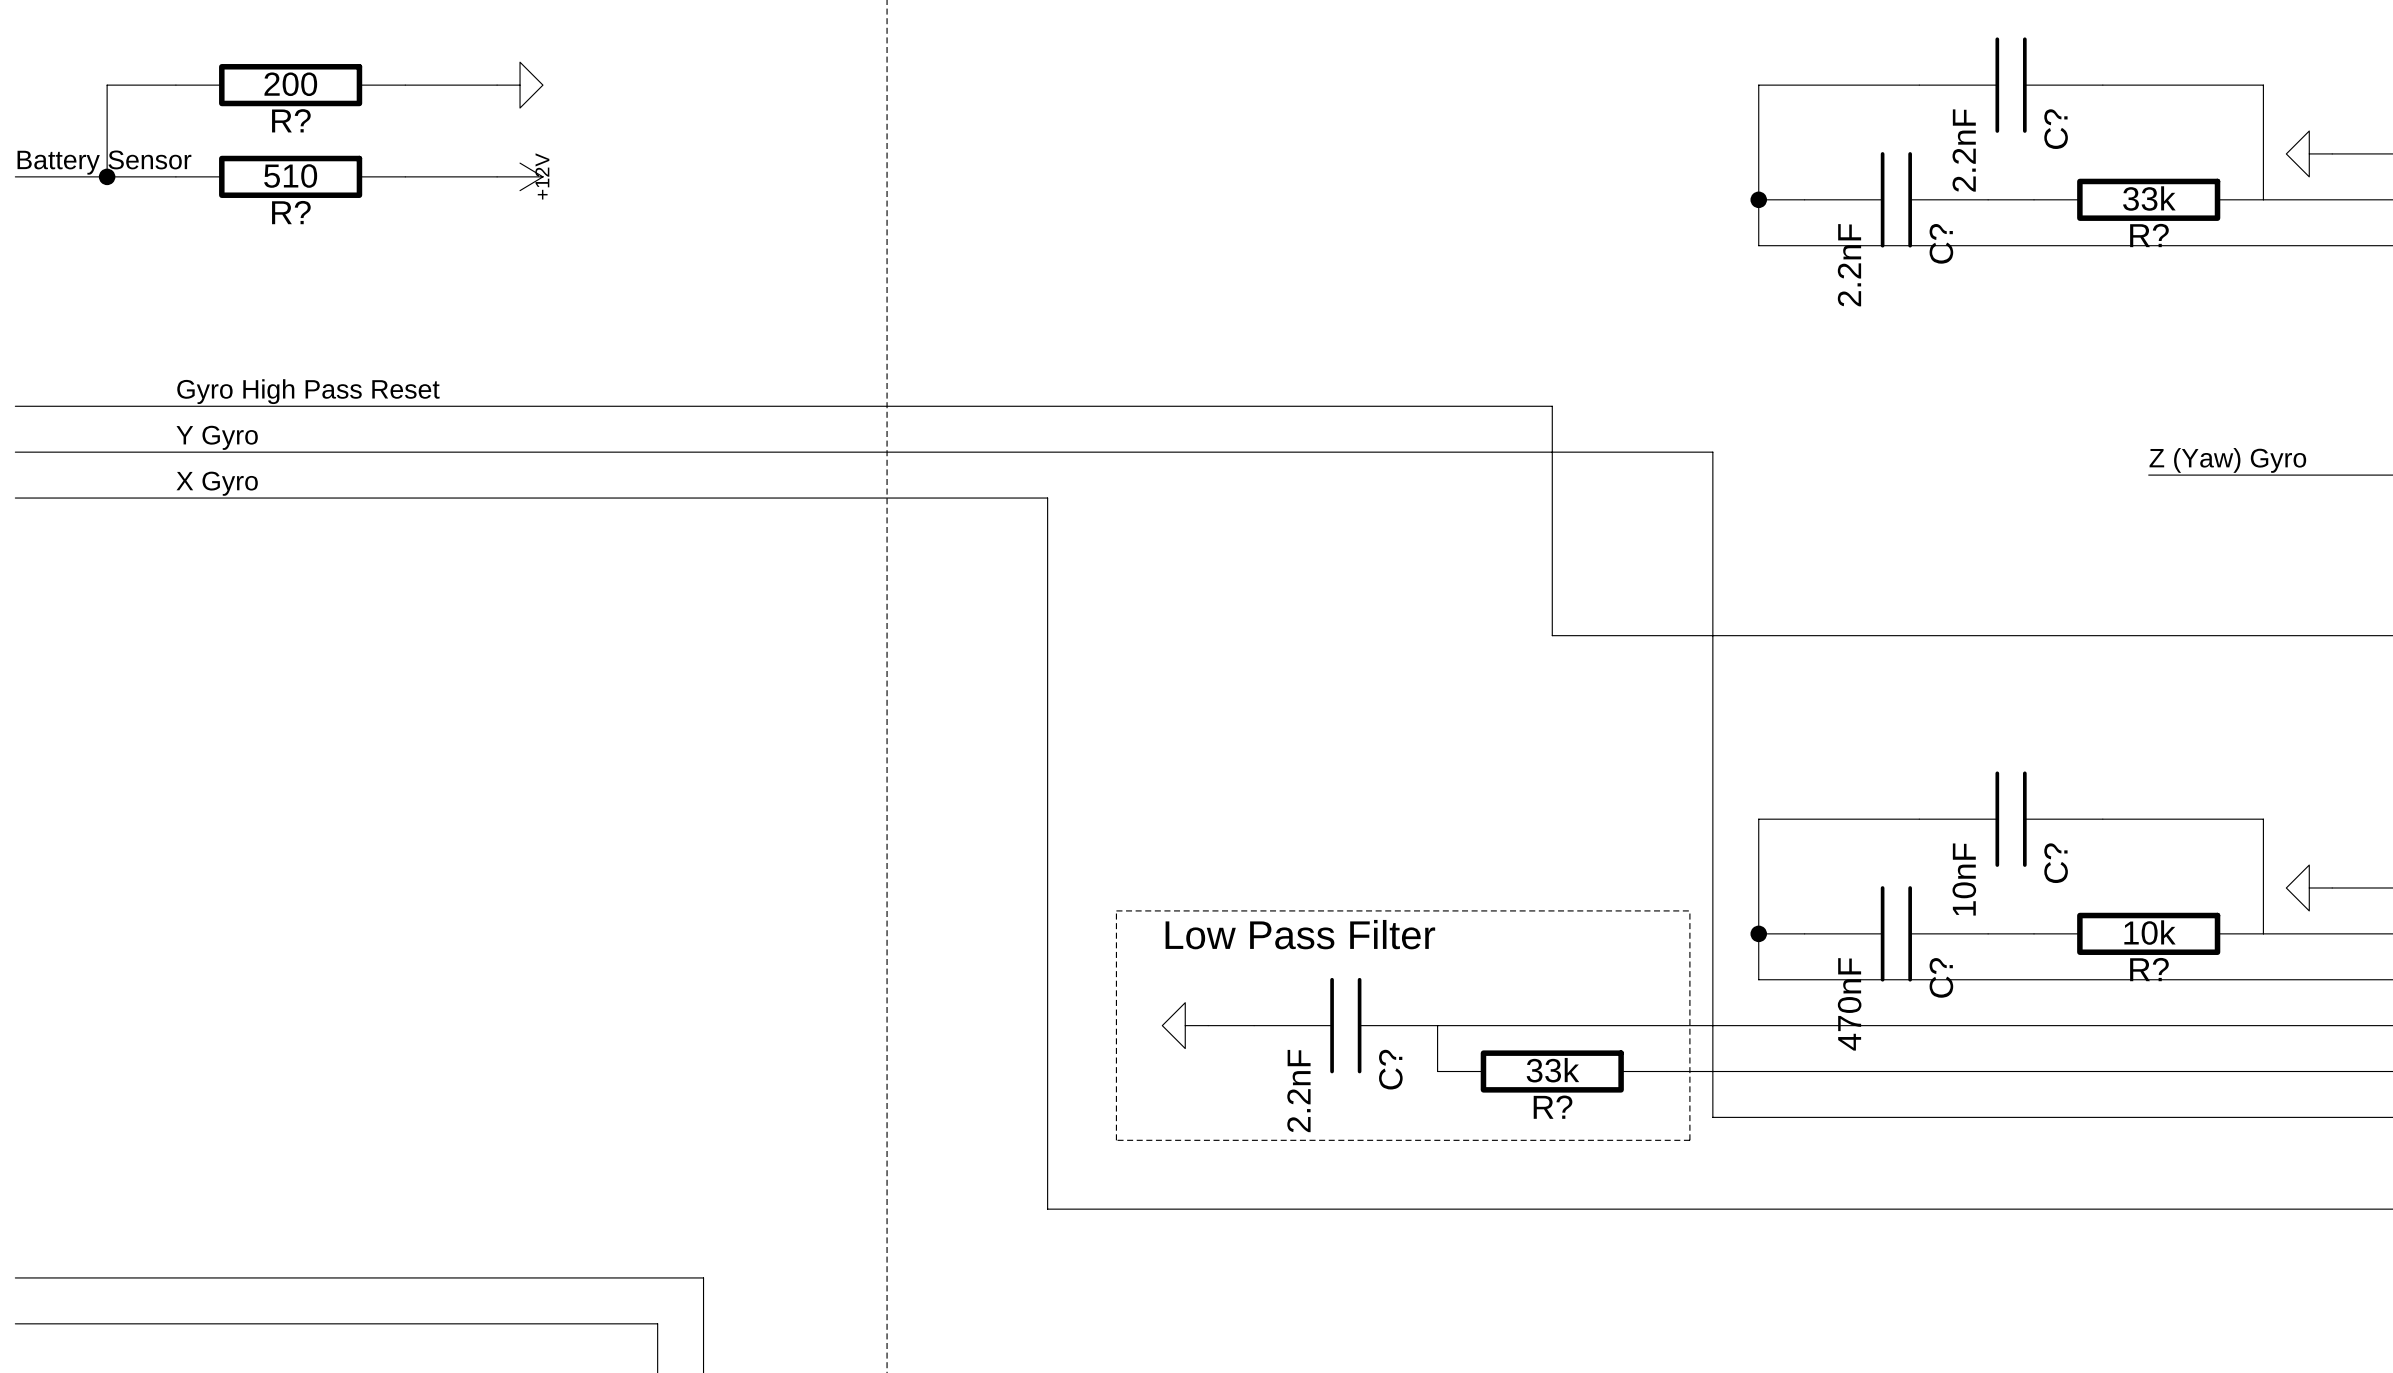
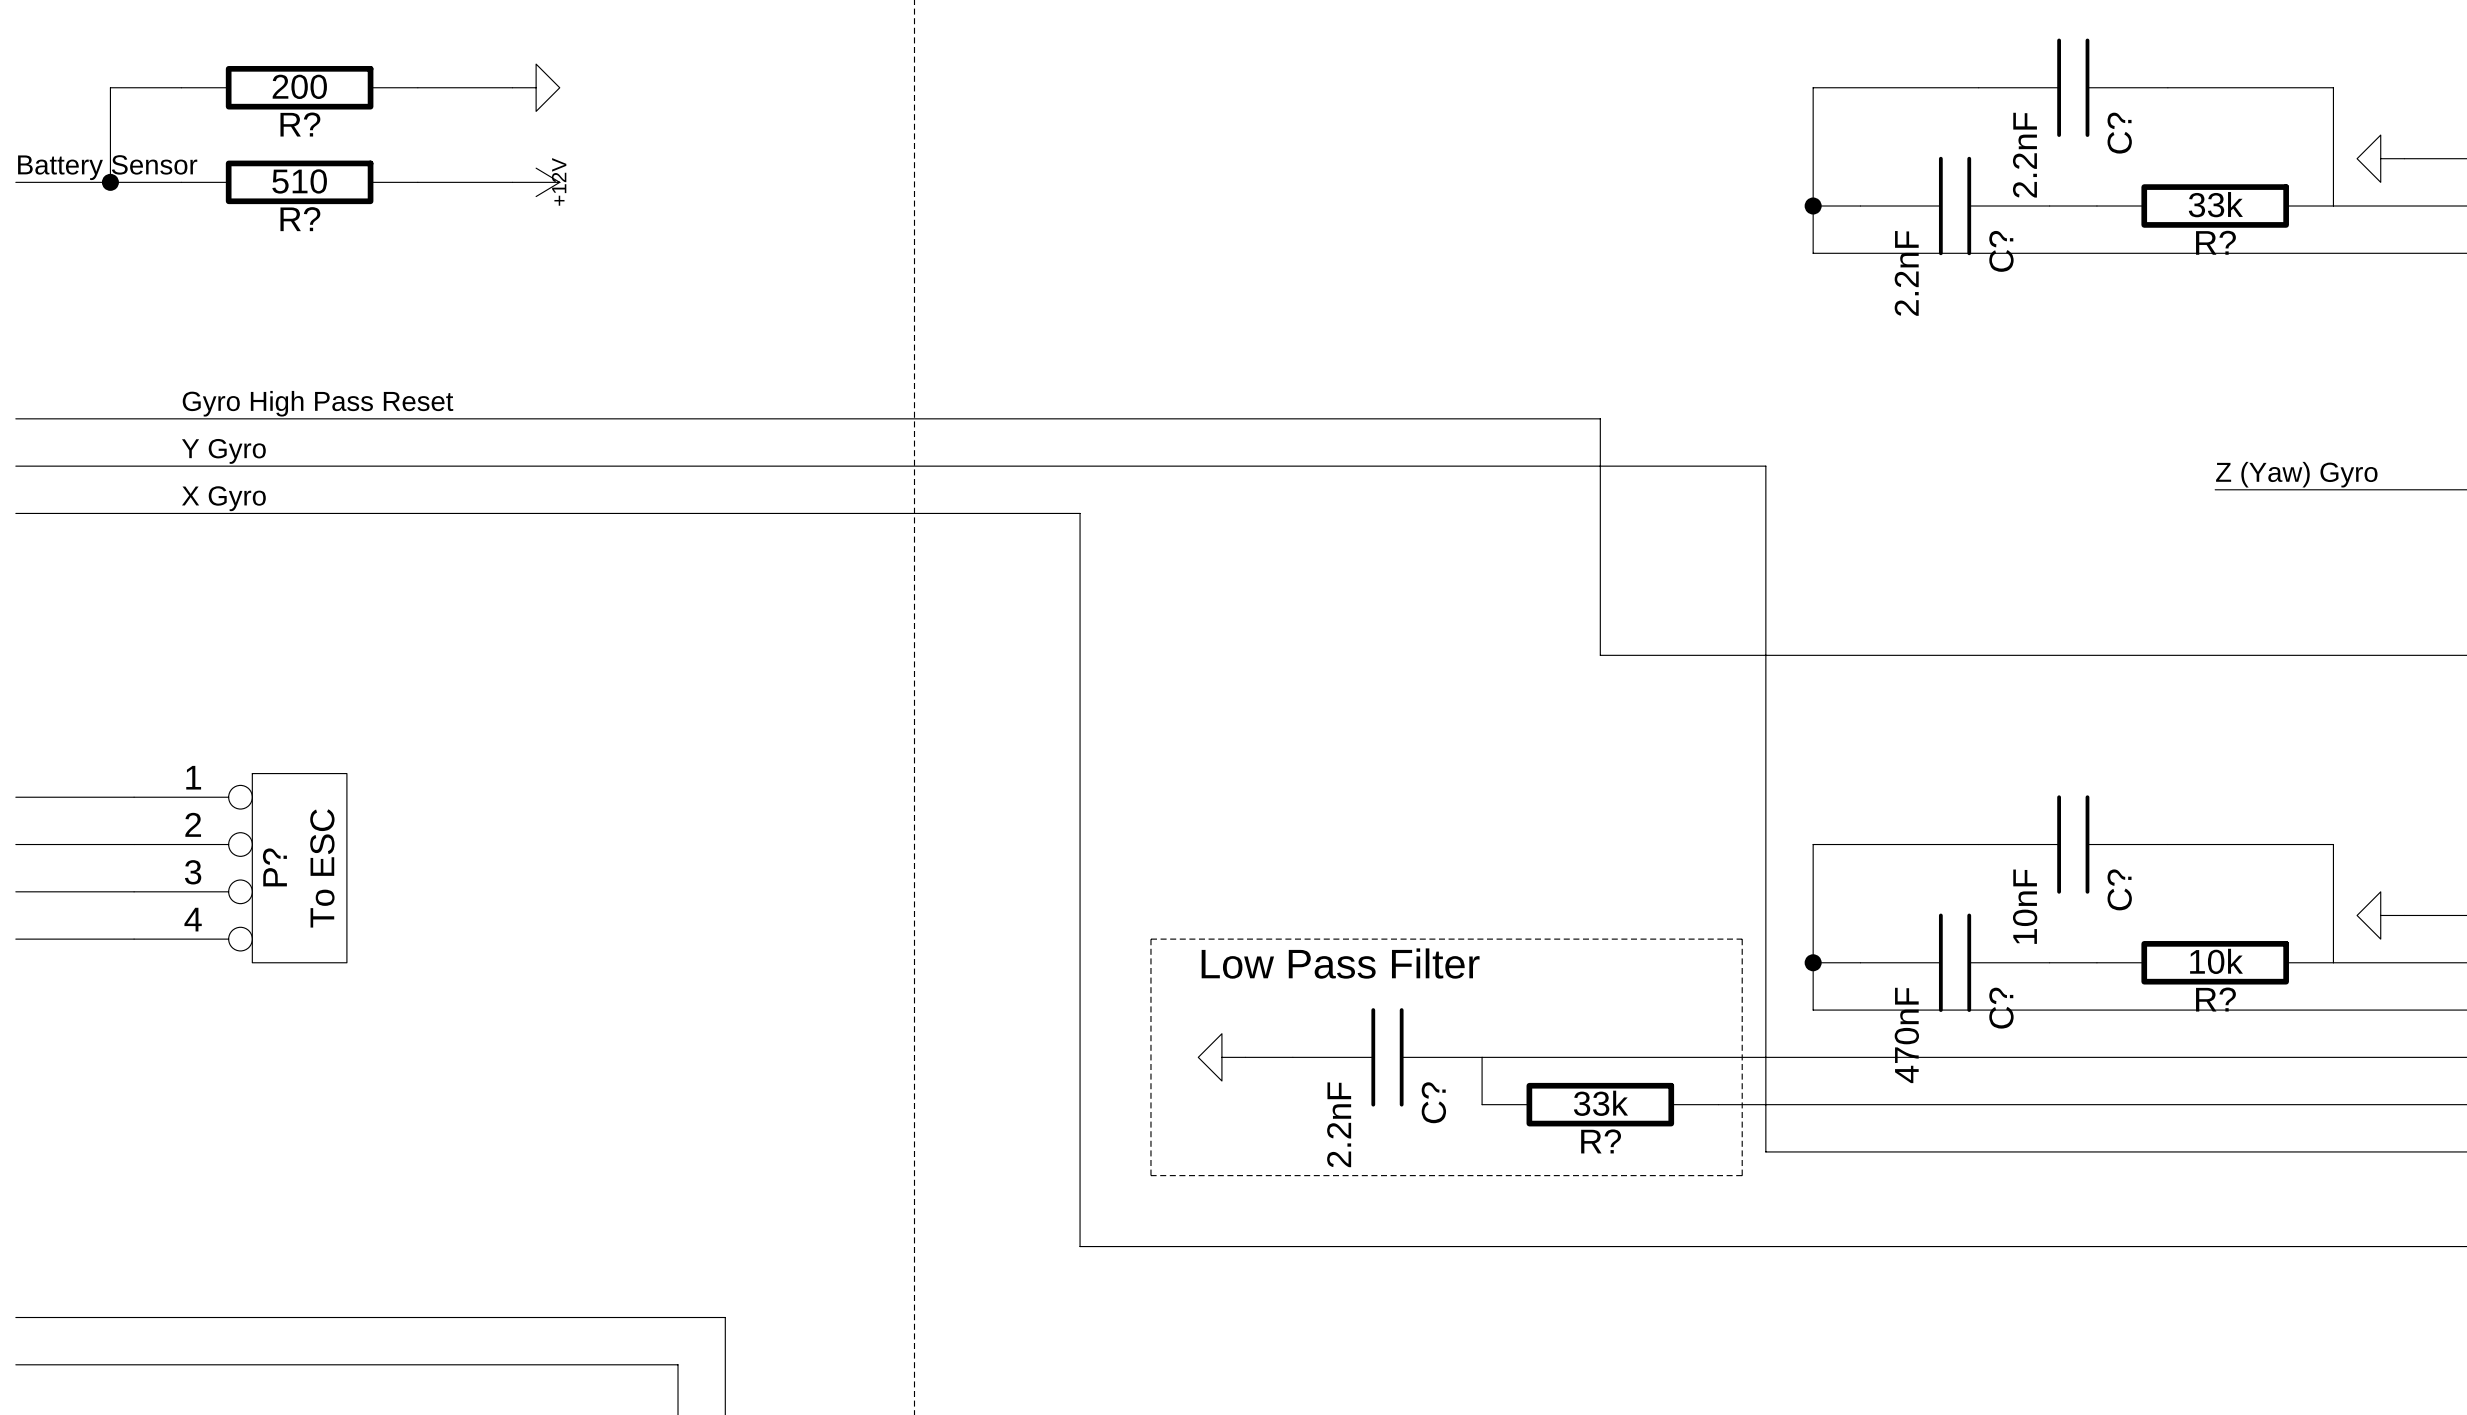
wire: none -> (15, 797) (134, 797)
wire: none -> (15, 844) (134, 844)
P?: none -> To ESC (240, 868)
wire: none -> (15, 891) (134, 891)
wire: none -> (15, 939) (134, 939)

